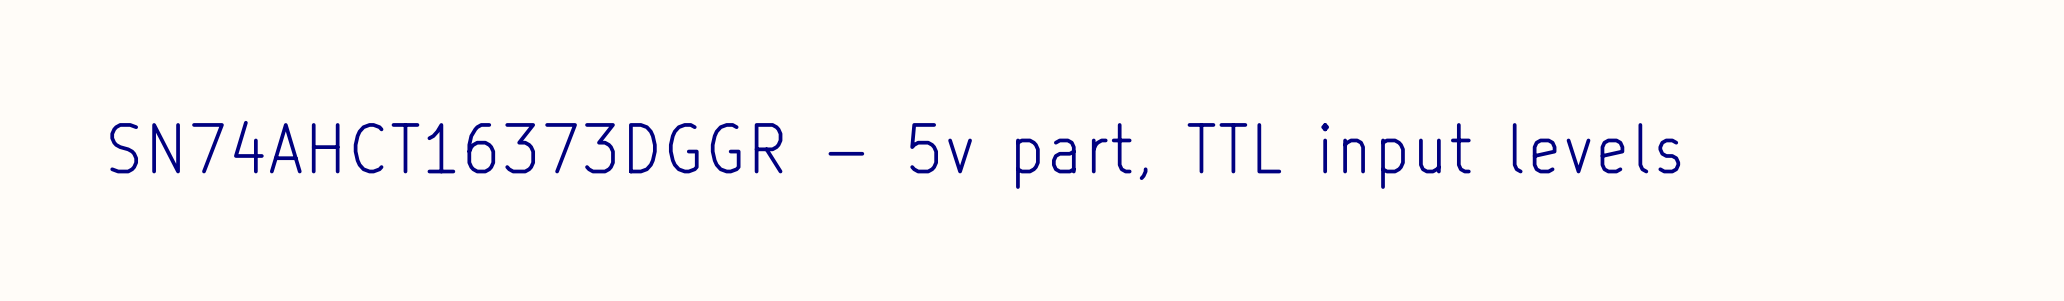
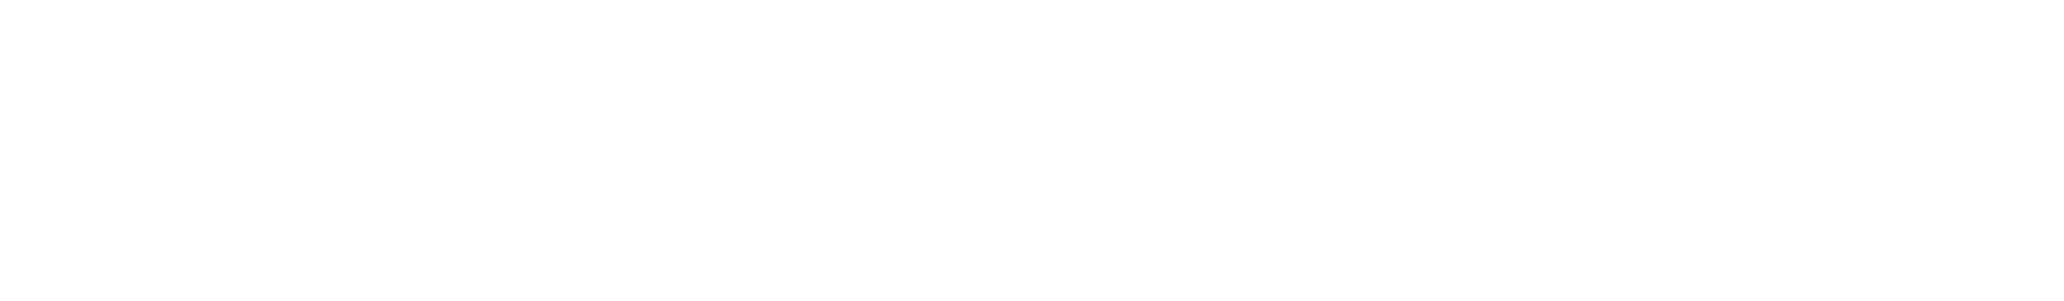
text: SN74AHCT16373DGGR - 5v part, TTL input levels (895, 154) -> none

